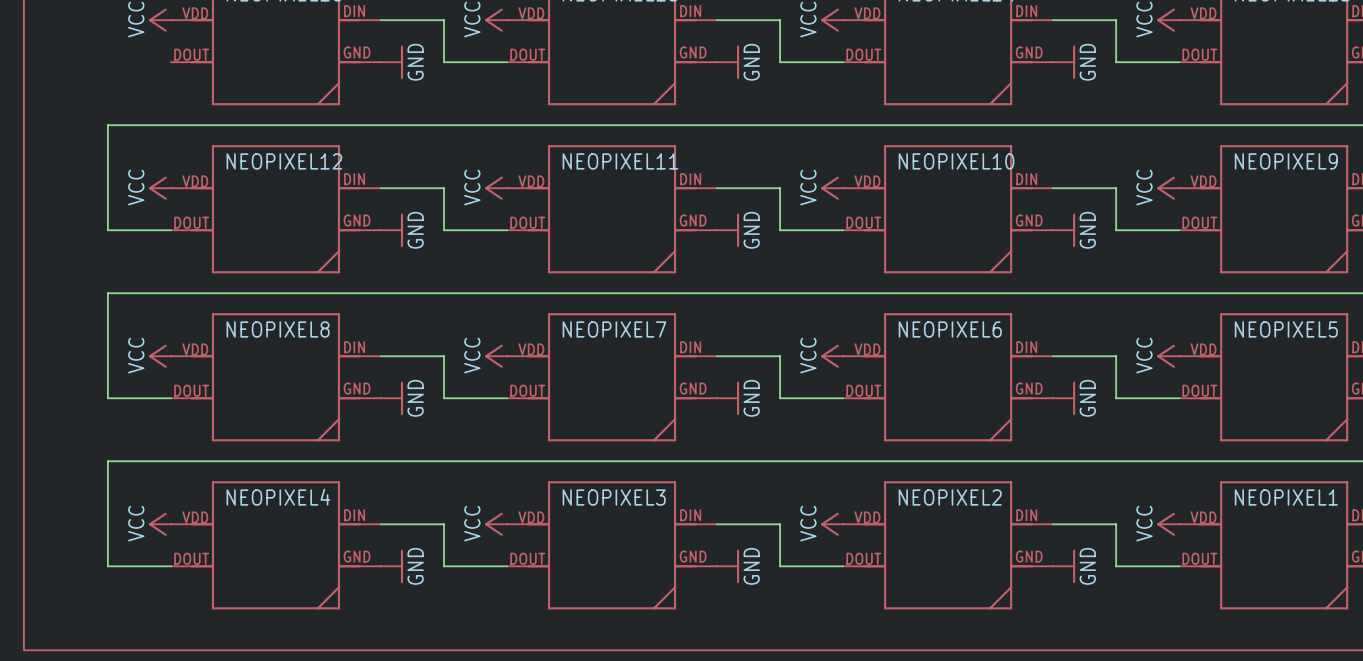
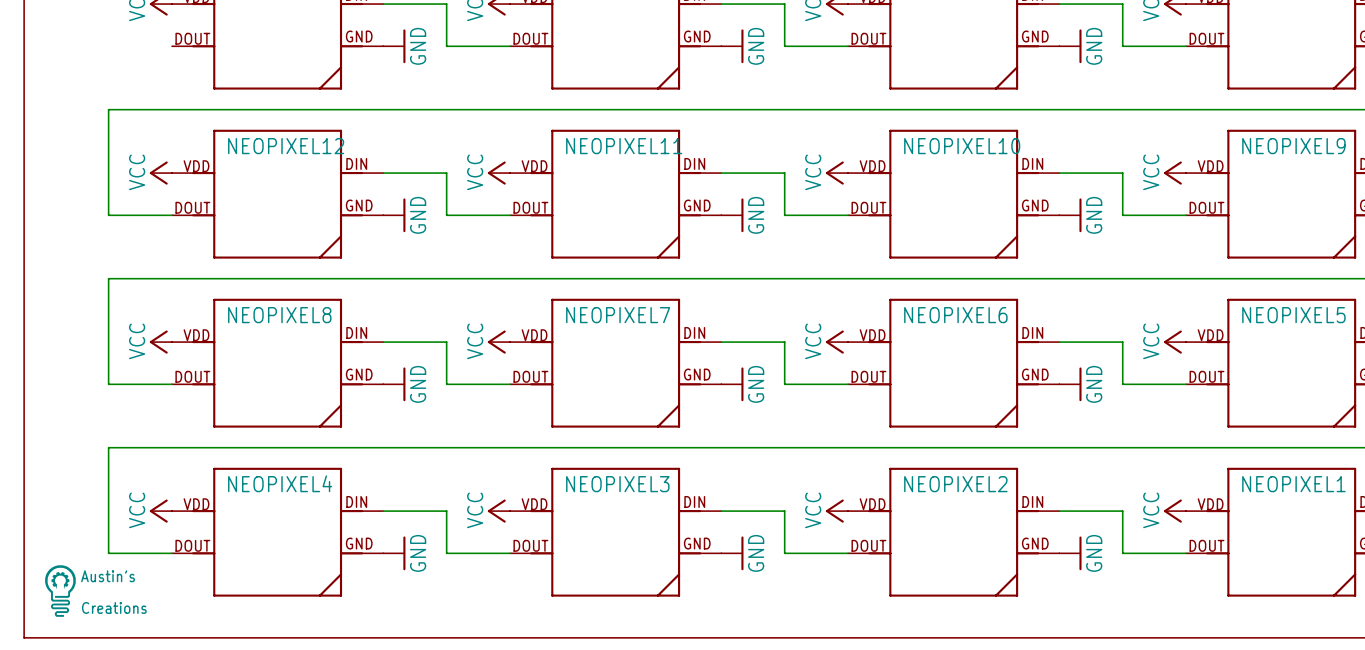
part: none -> (60, 591)

